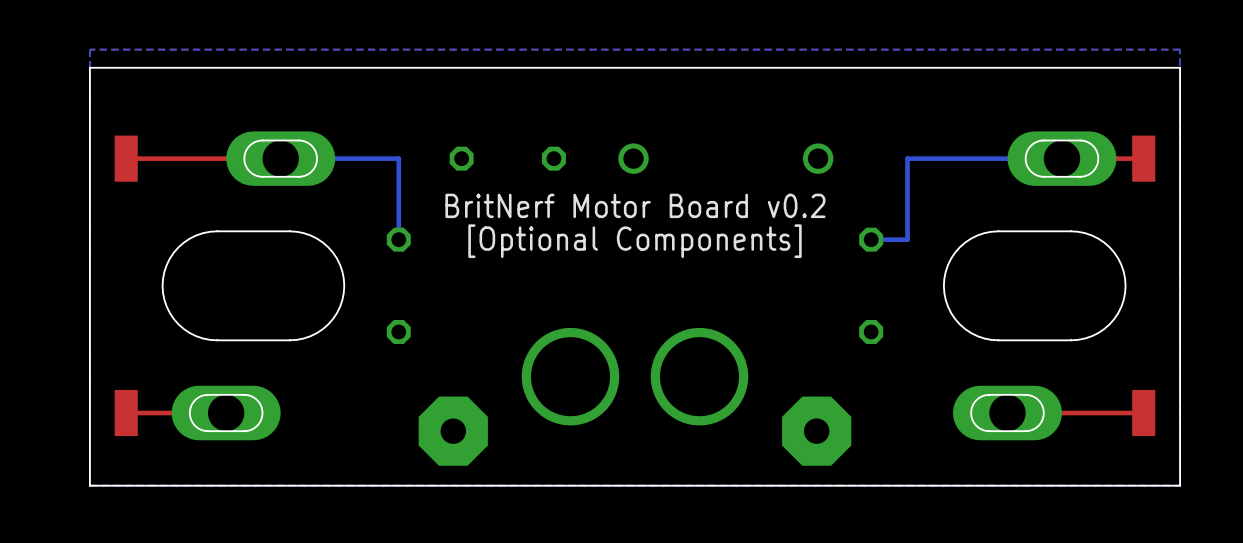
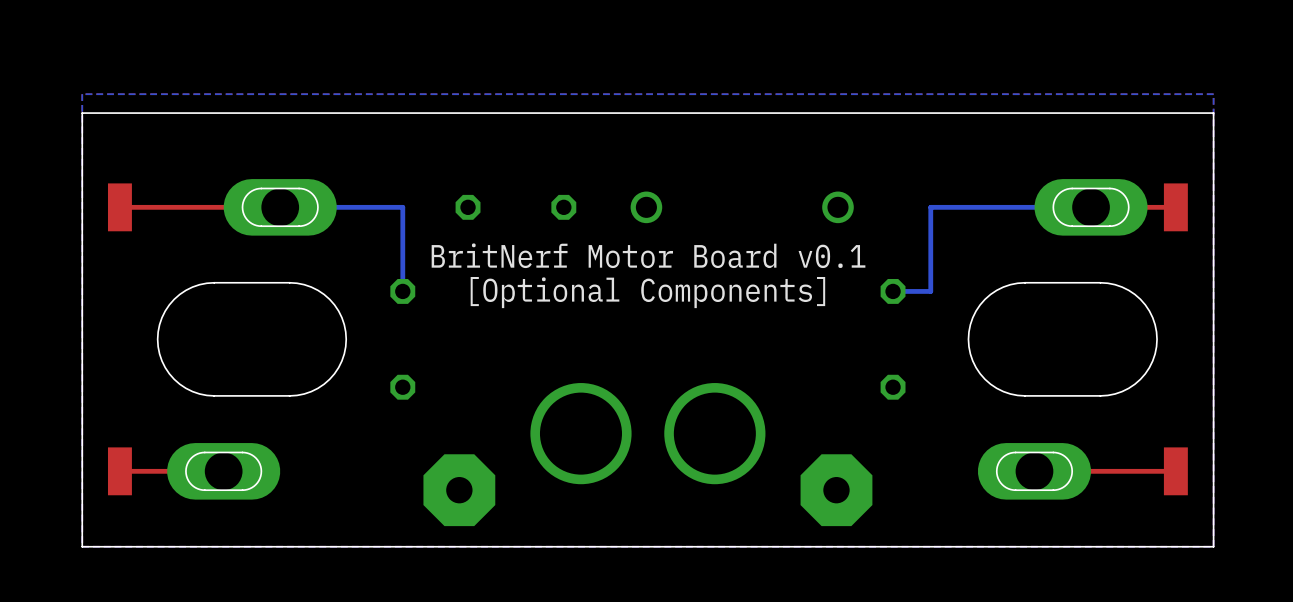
text: BritNerf Motor Board v0.2 (635, 205) -> BritNerf Motor Board v0.1 (648, 255)

